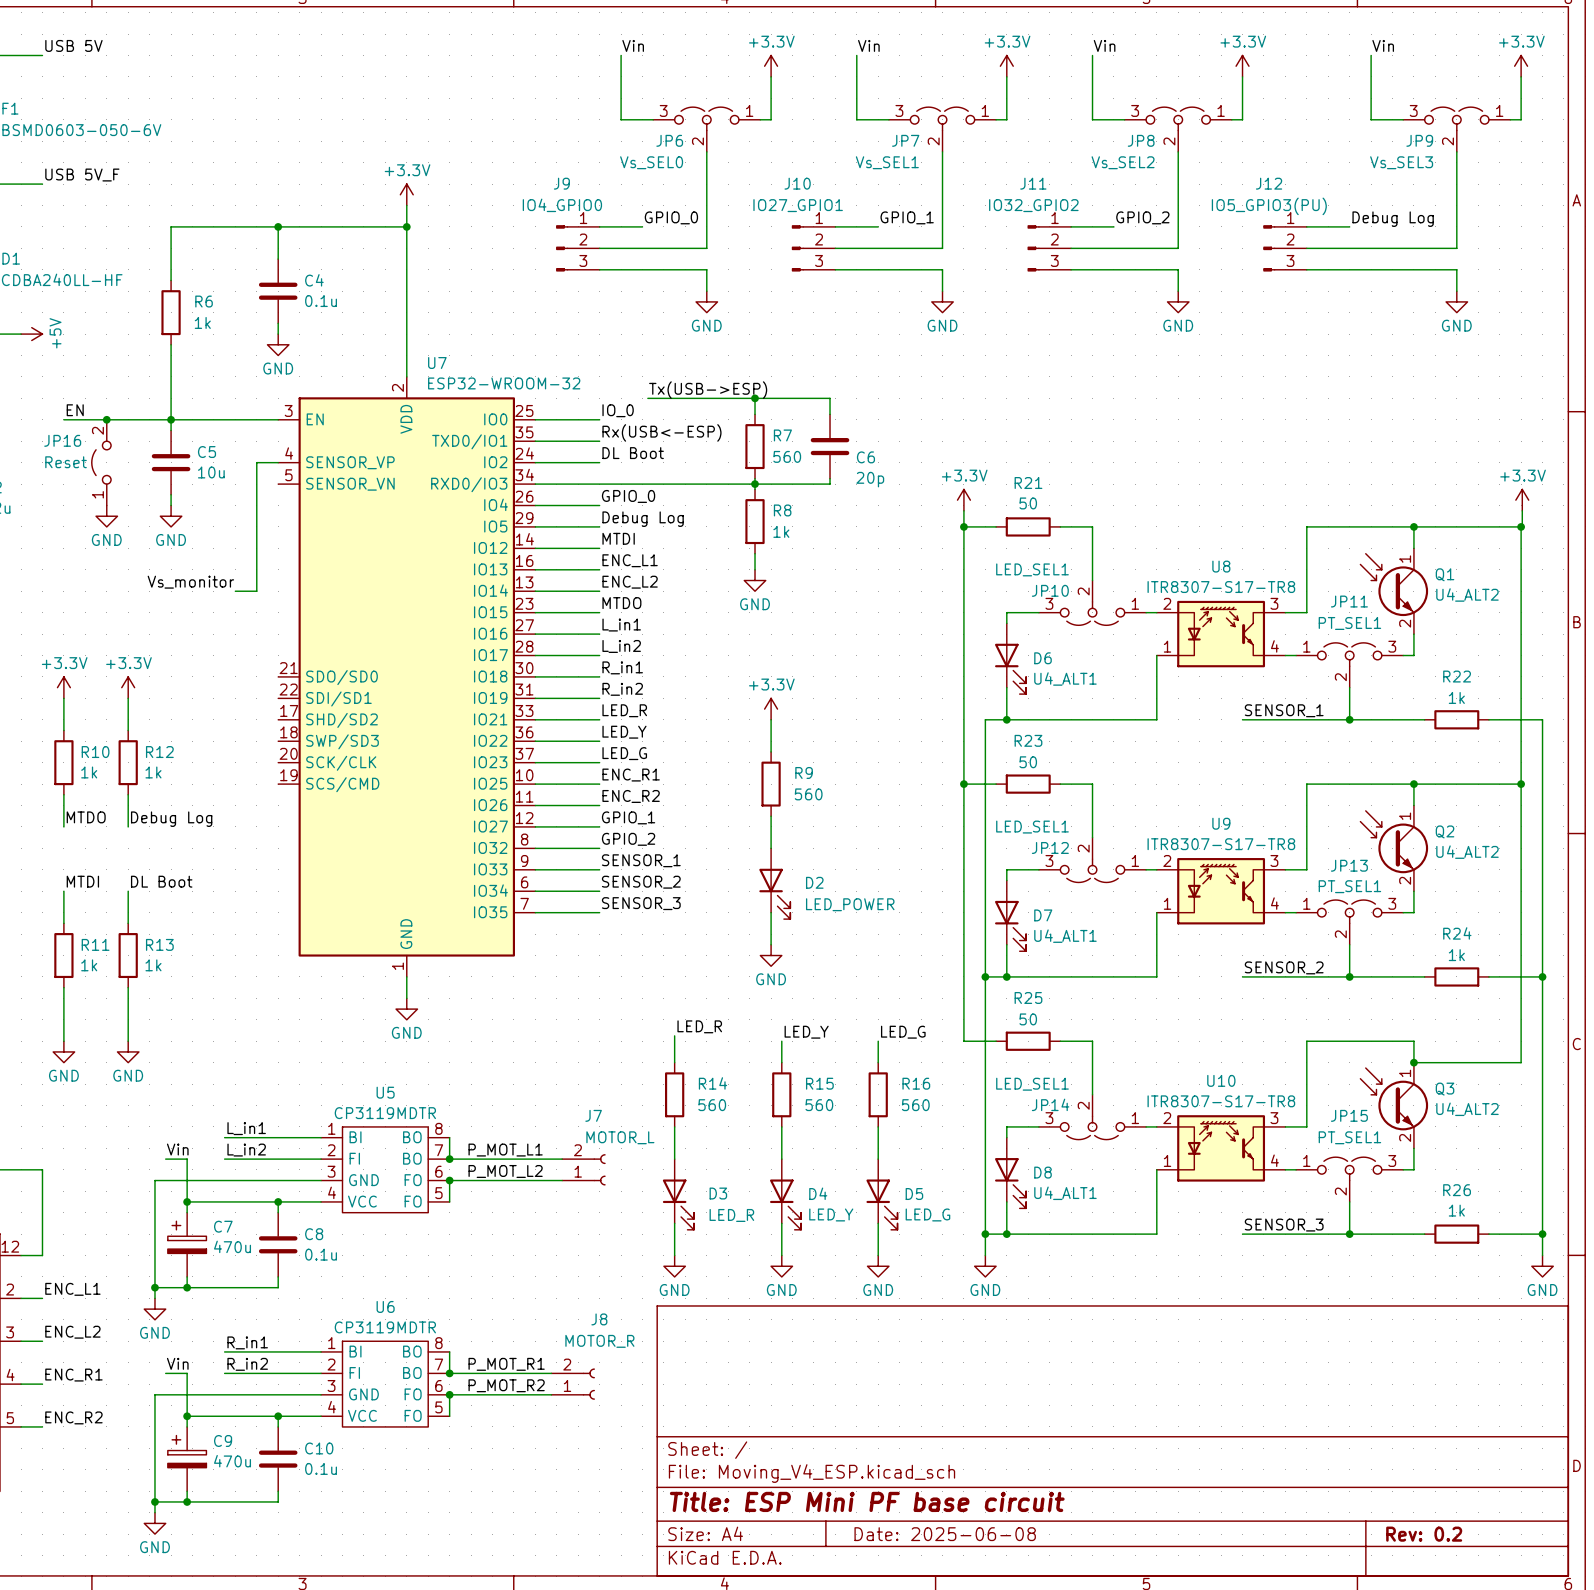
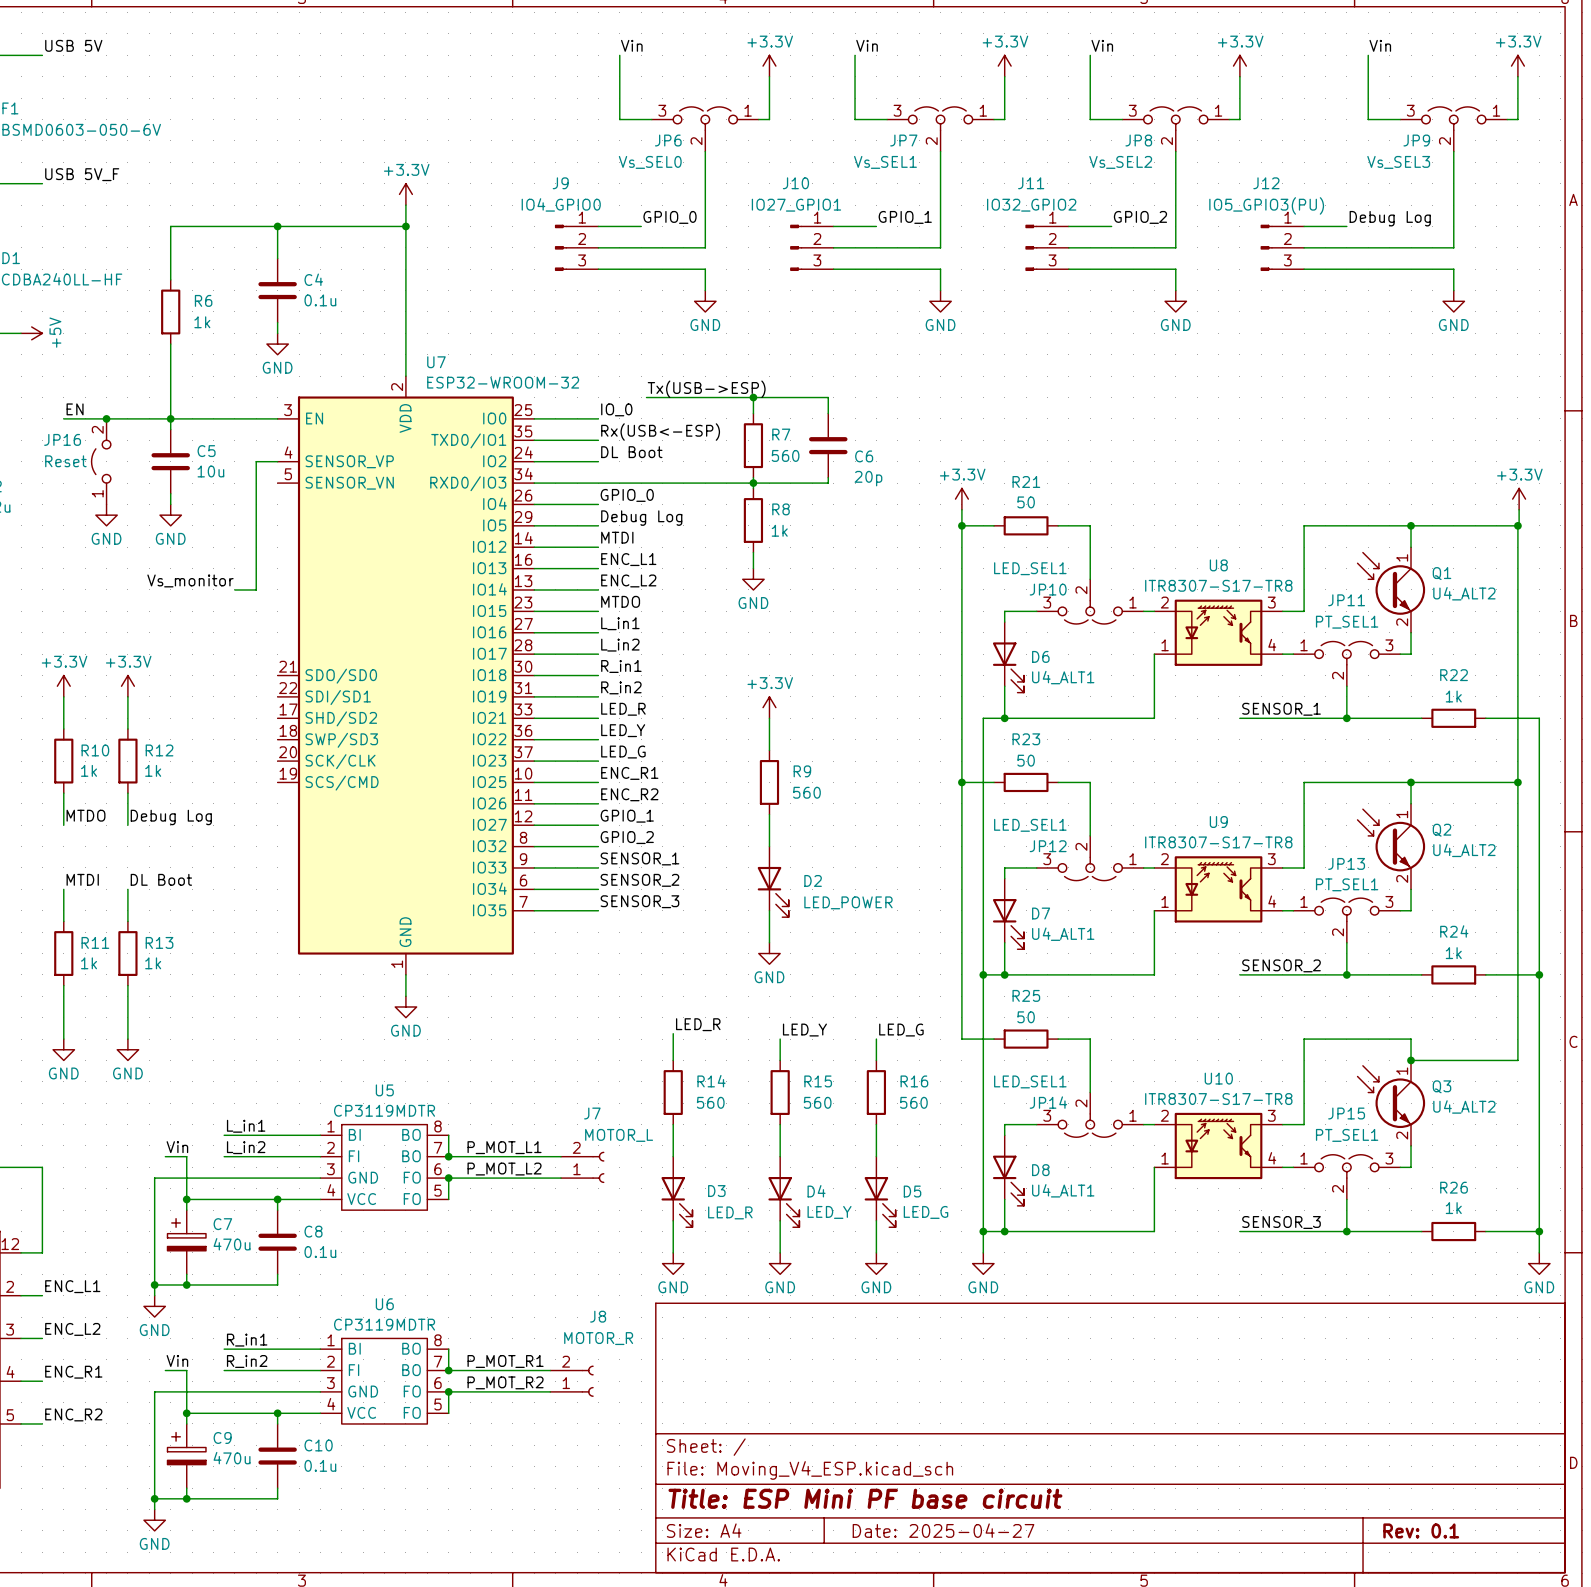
title block: Date: 2025-06-08 (945, 1534) -> Date: 2025-04-27 (943, 1530)
title block: Rev: 0.2 (1424, 1534) -> Rev: 0.1 (1421, 1530)

